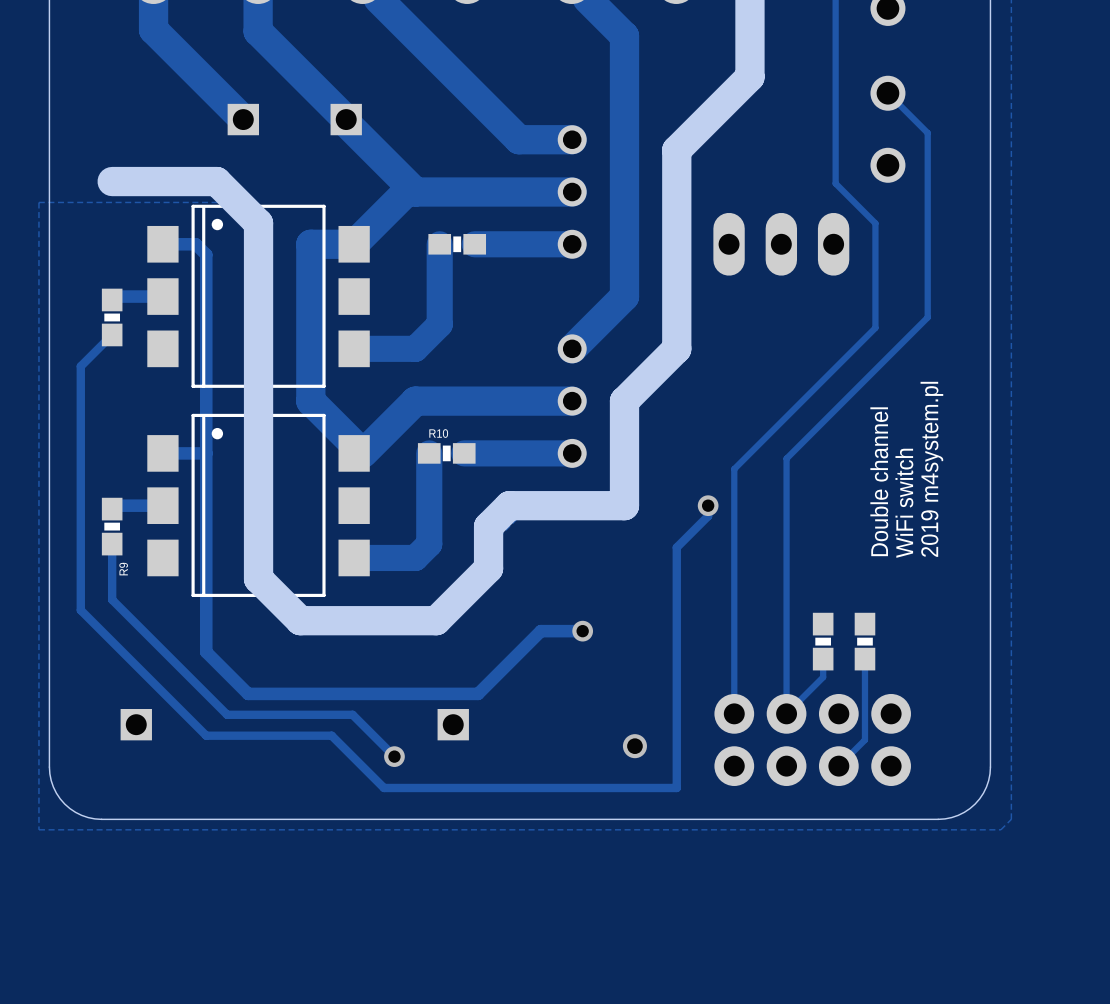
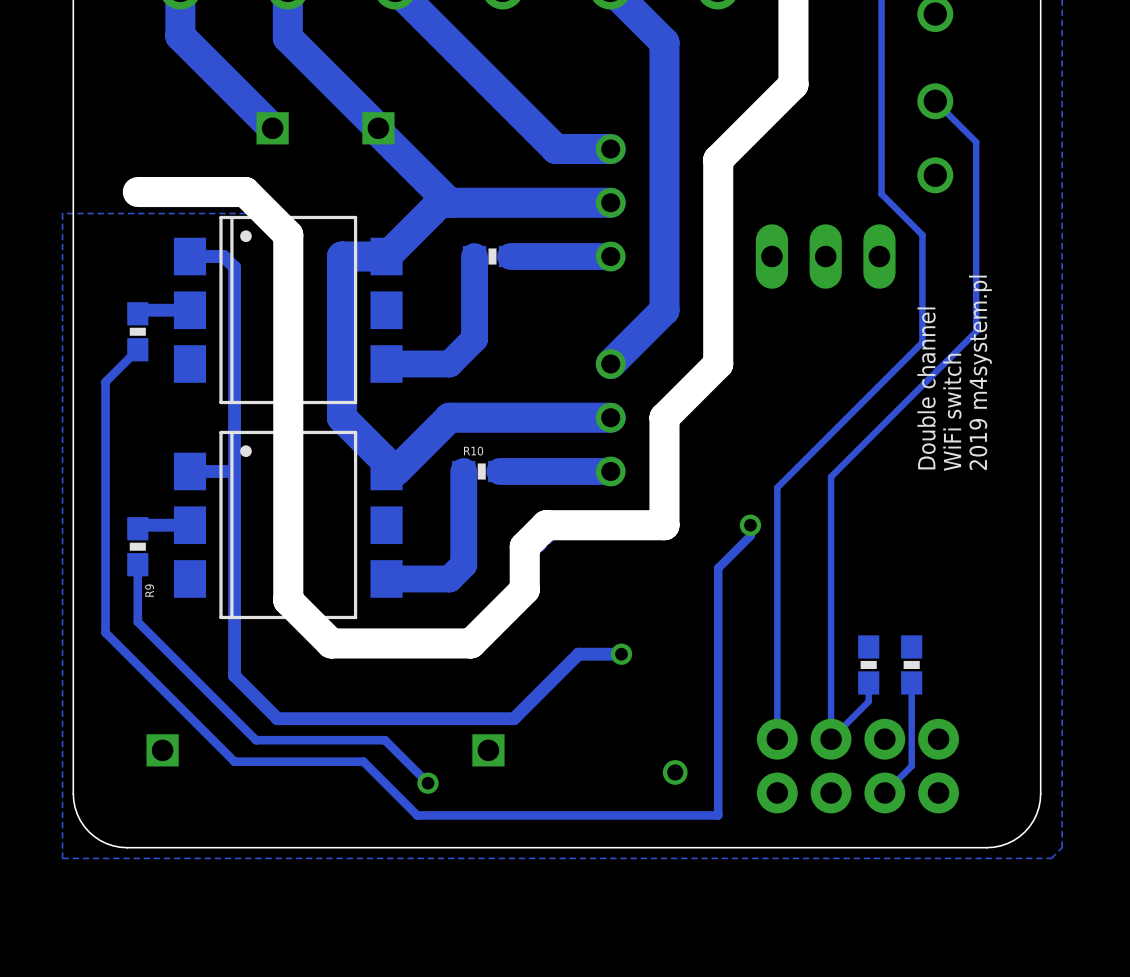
text position: 2019 m4system.pl (931, 469) -> 2019 m4system.pl (980, 372)
text position: Double channel (879, 481) -> Double channel (926, 388)
text position: WiFi switch (904, 503) -> WiFi switch (952, 412)

